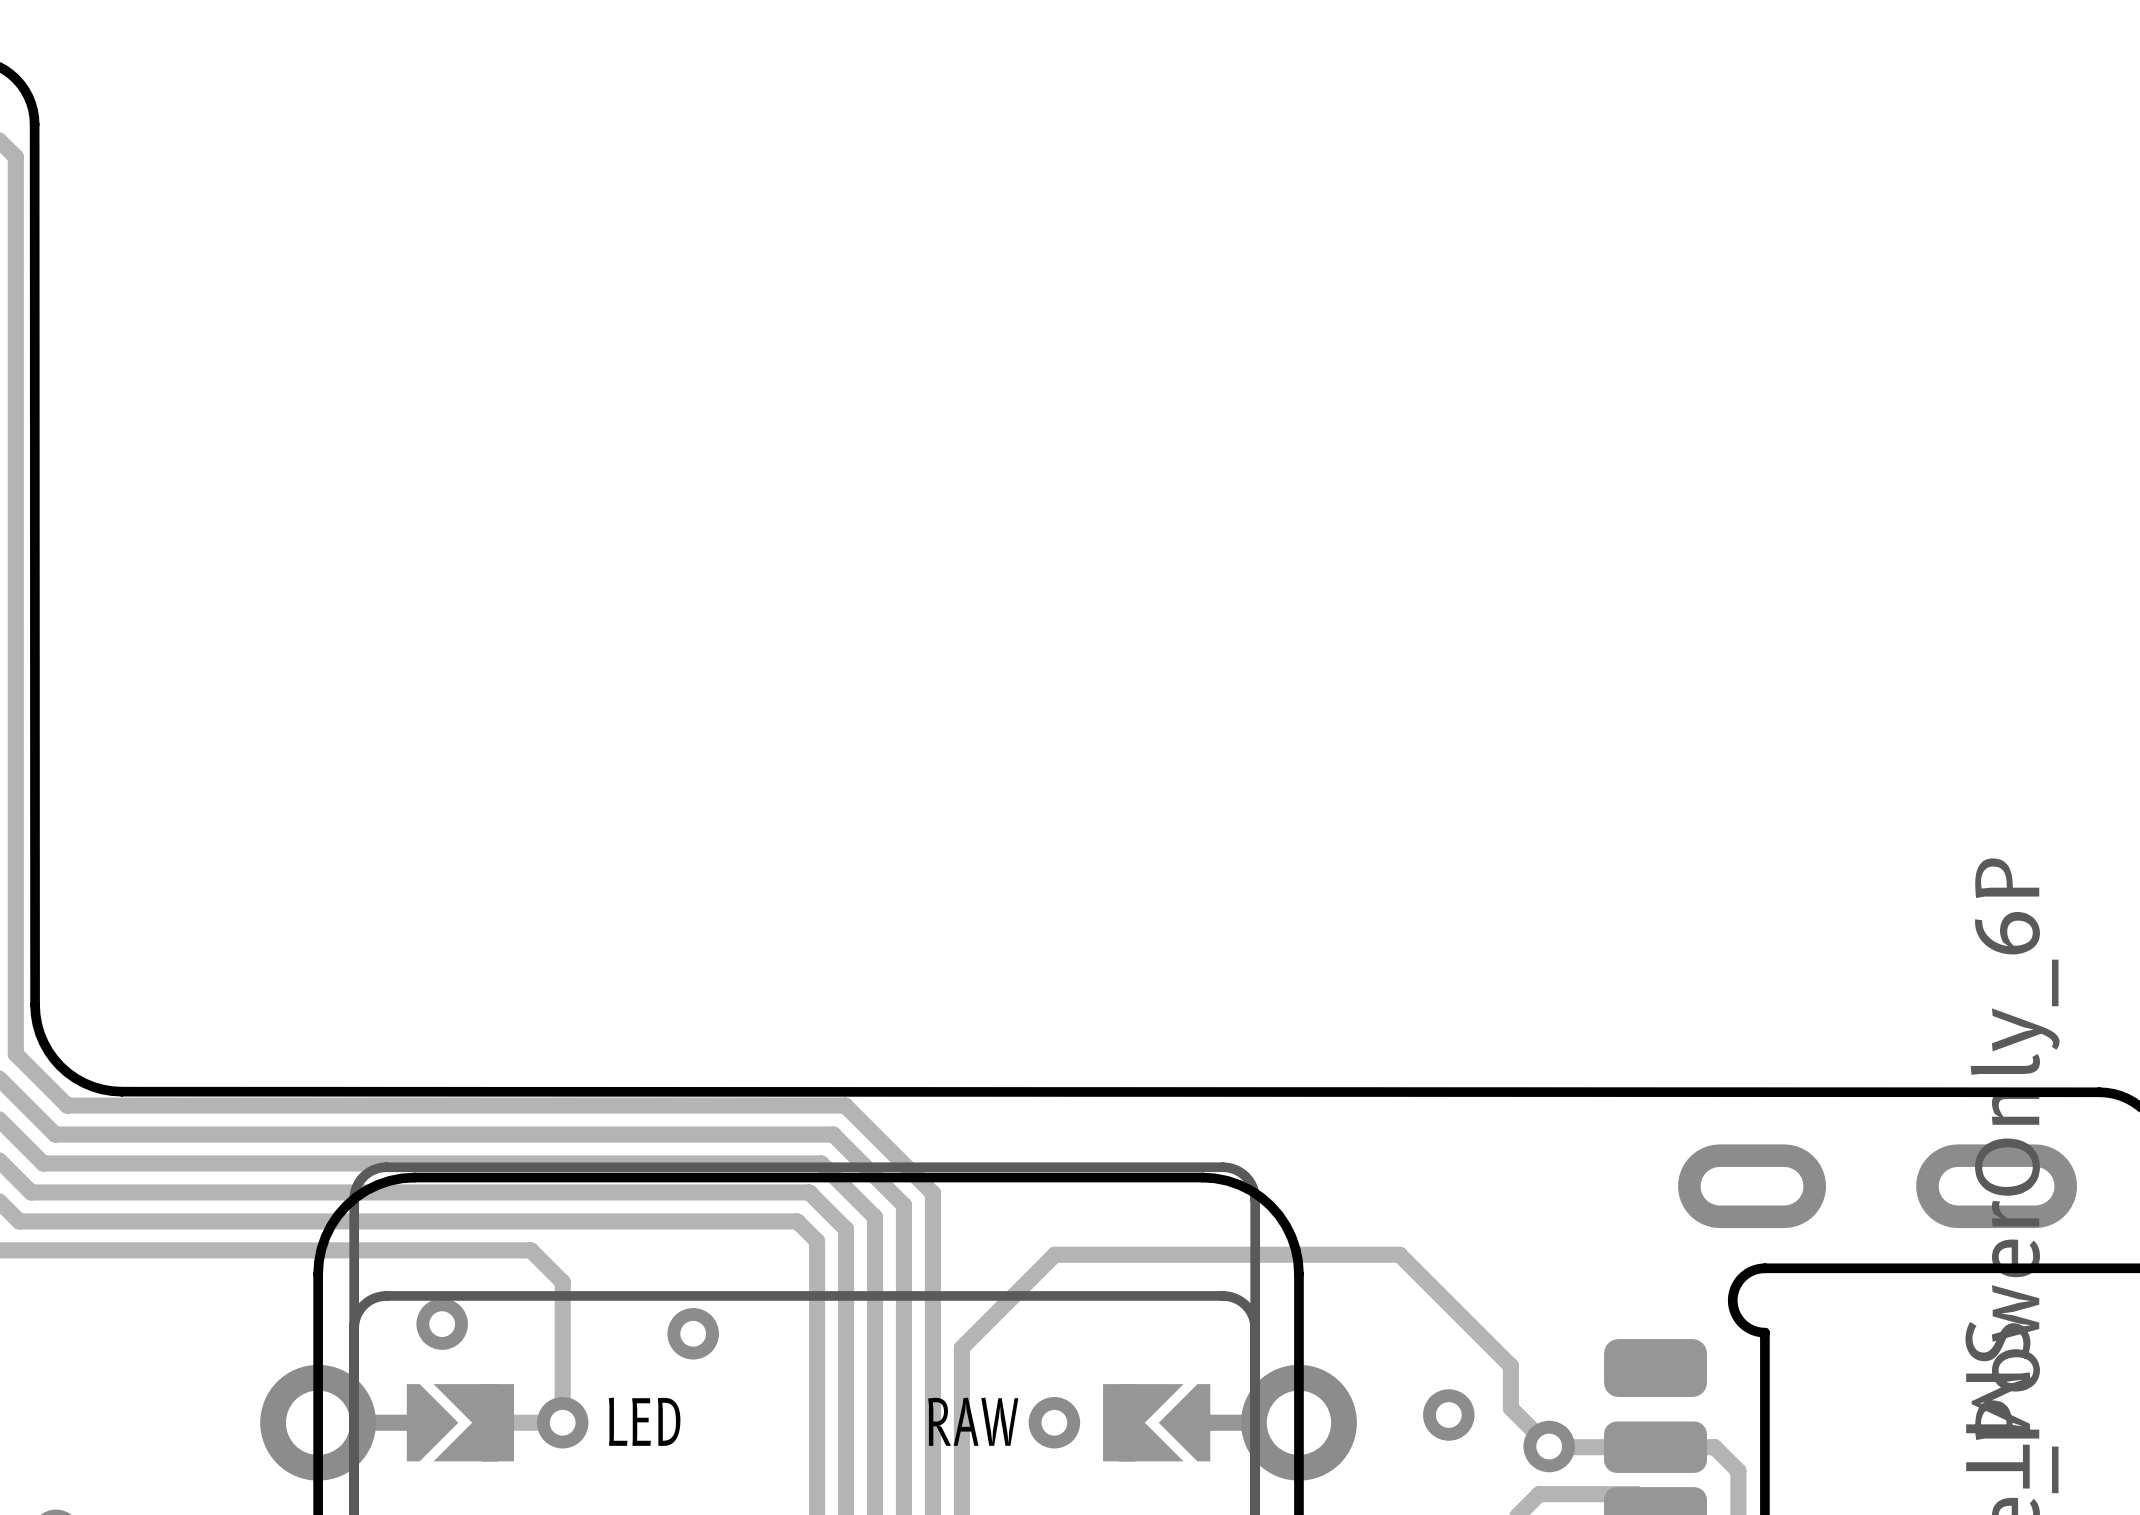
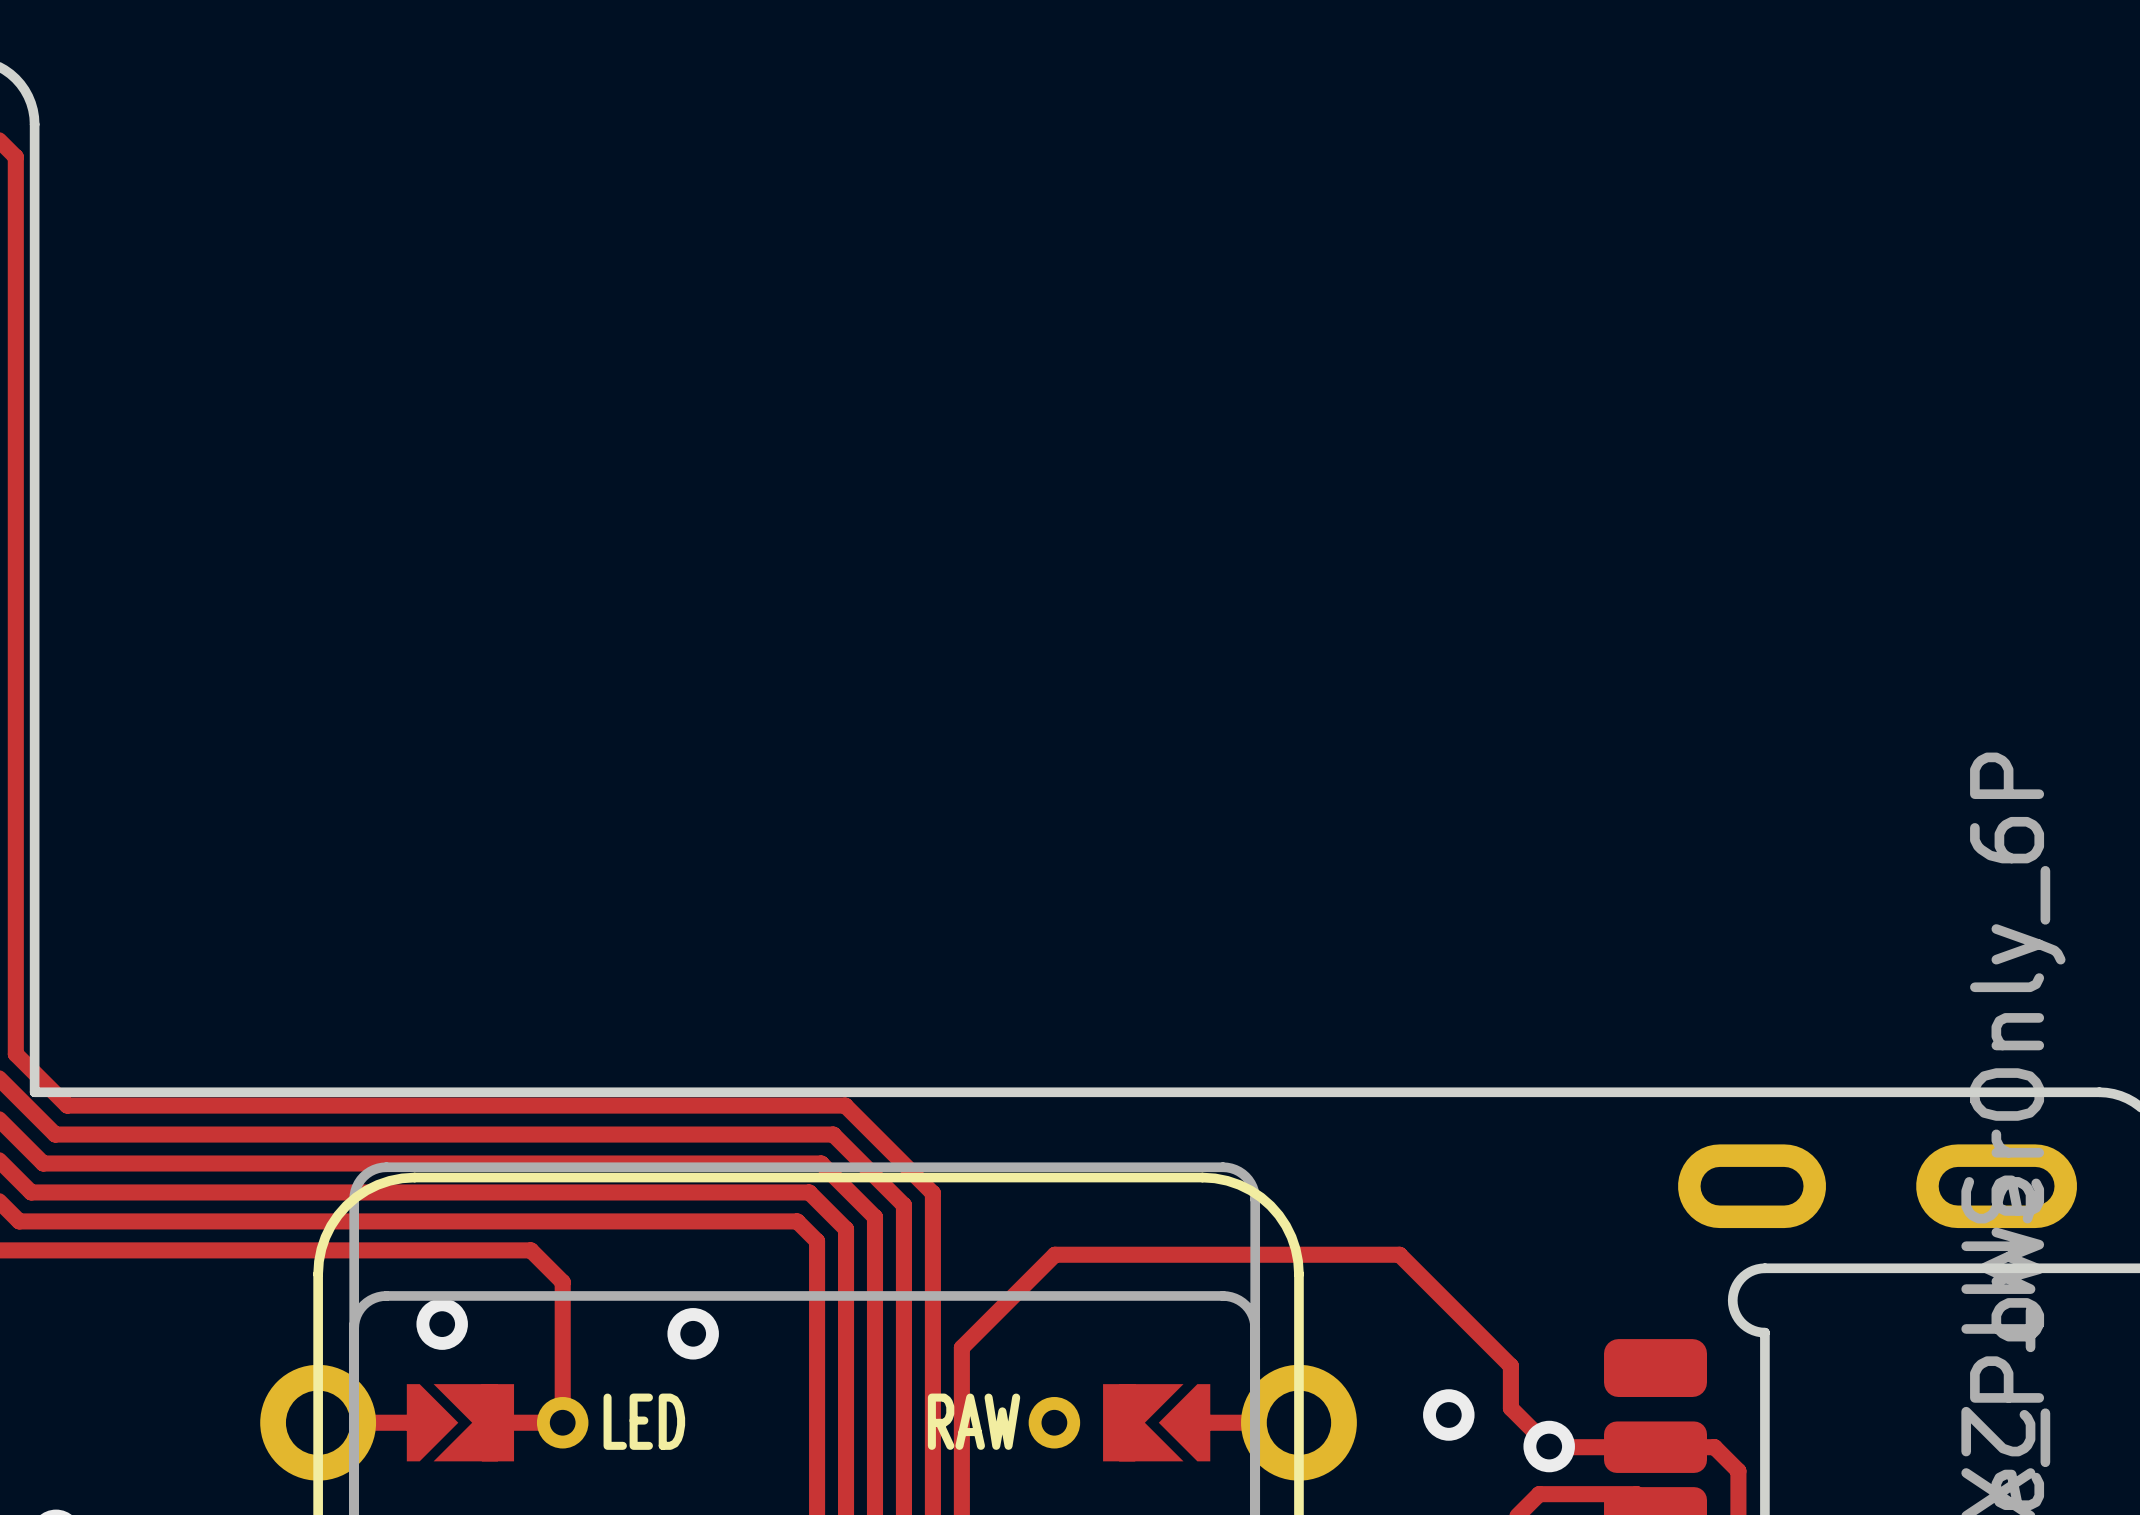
board edge: (34, 124) (35, 1005) (37, 1024) (48, 1051) (60, 1066) (84, 1083) (102, 1089) (121, 1091) (2099, 1092) -> (34, 124) (34, 1092) (2099, 1092)

